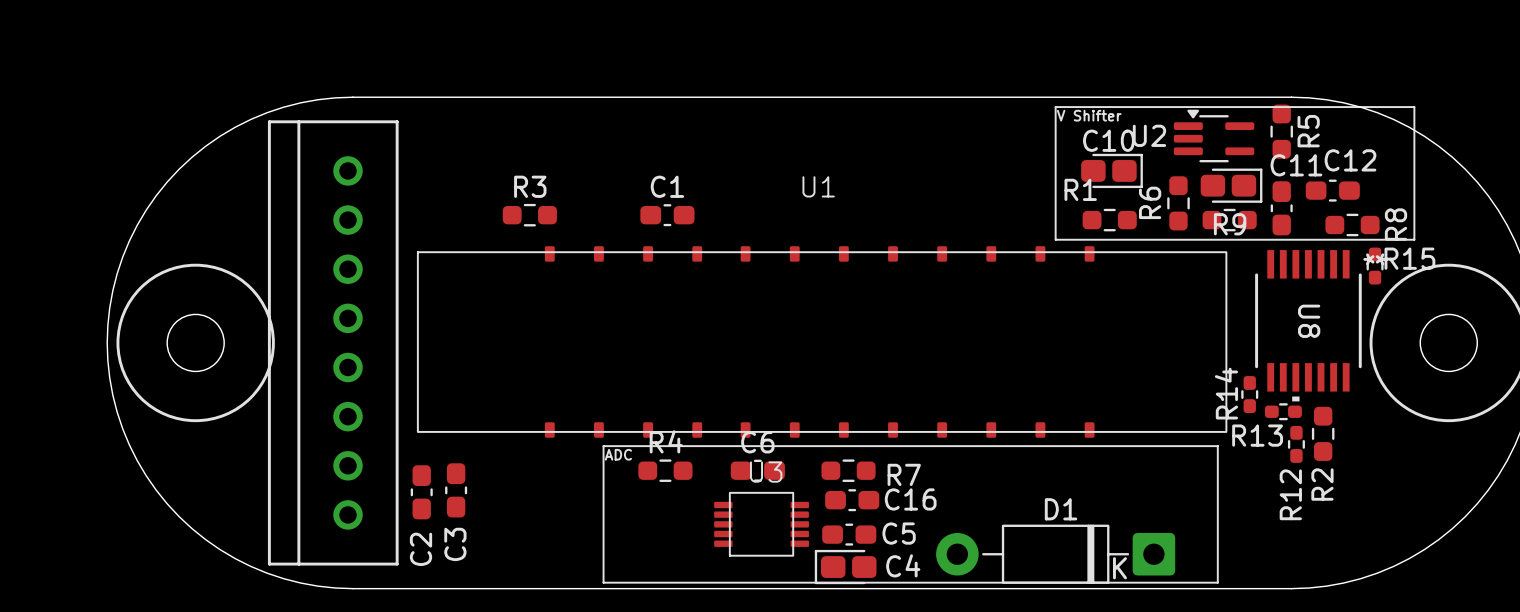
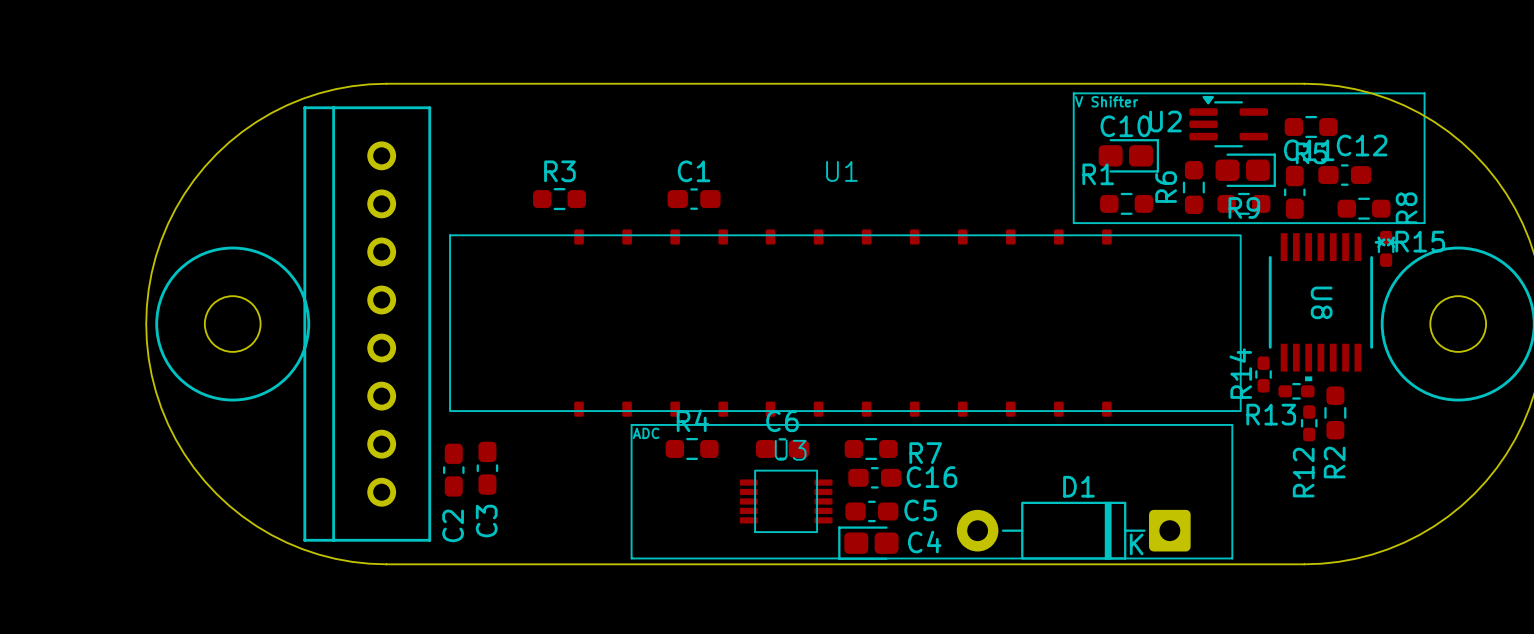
R5 rotation: 0° (1281, 131) -> 90° clockwise (1311, 126)

